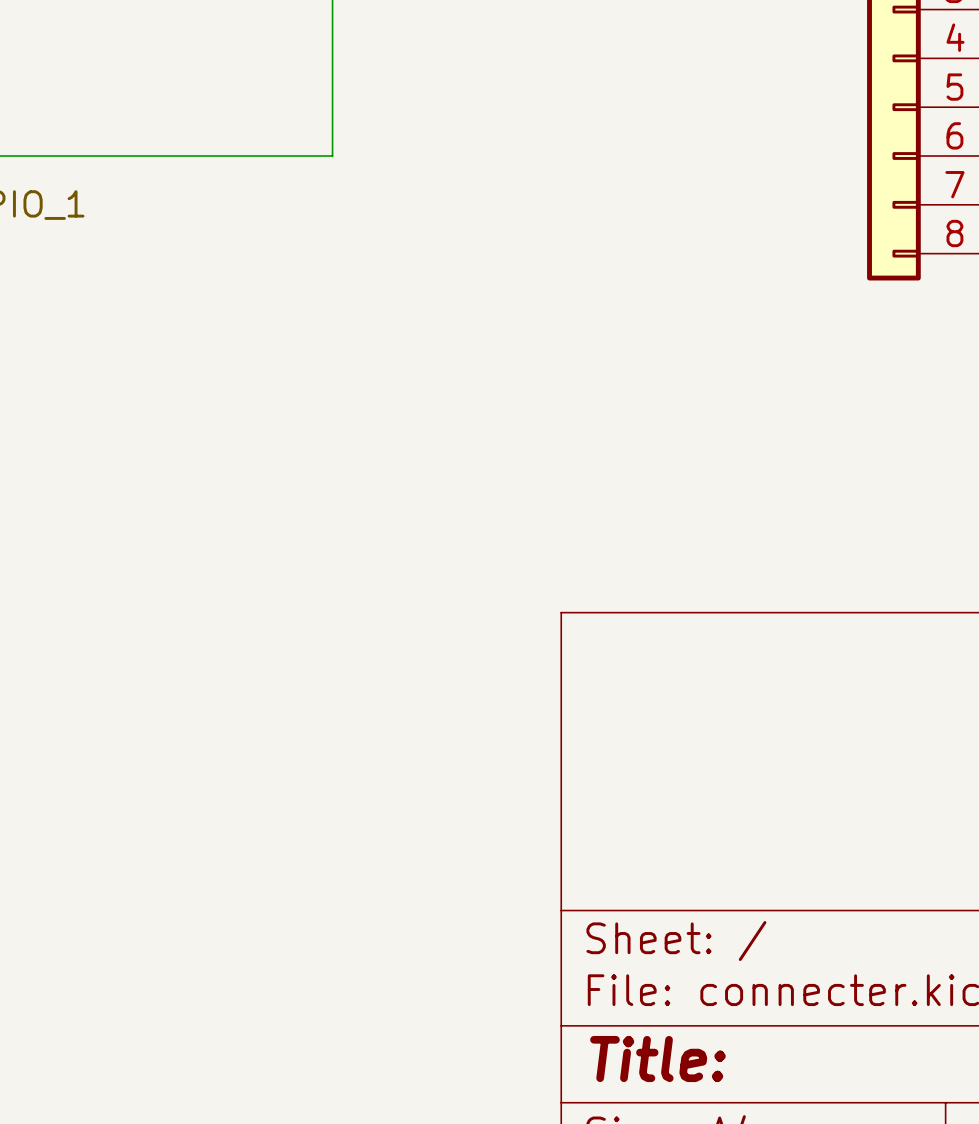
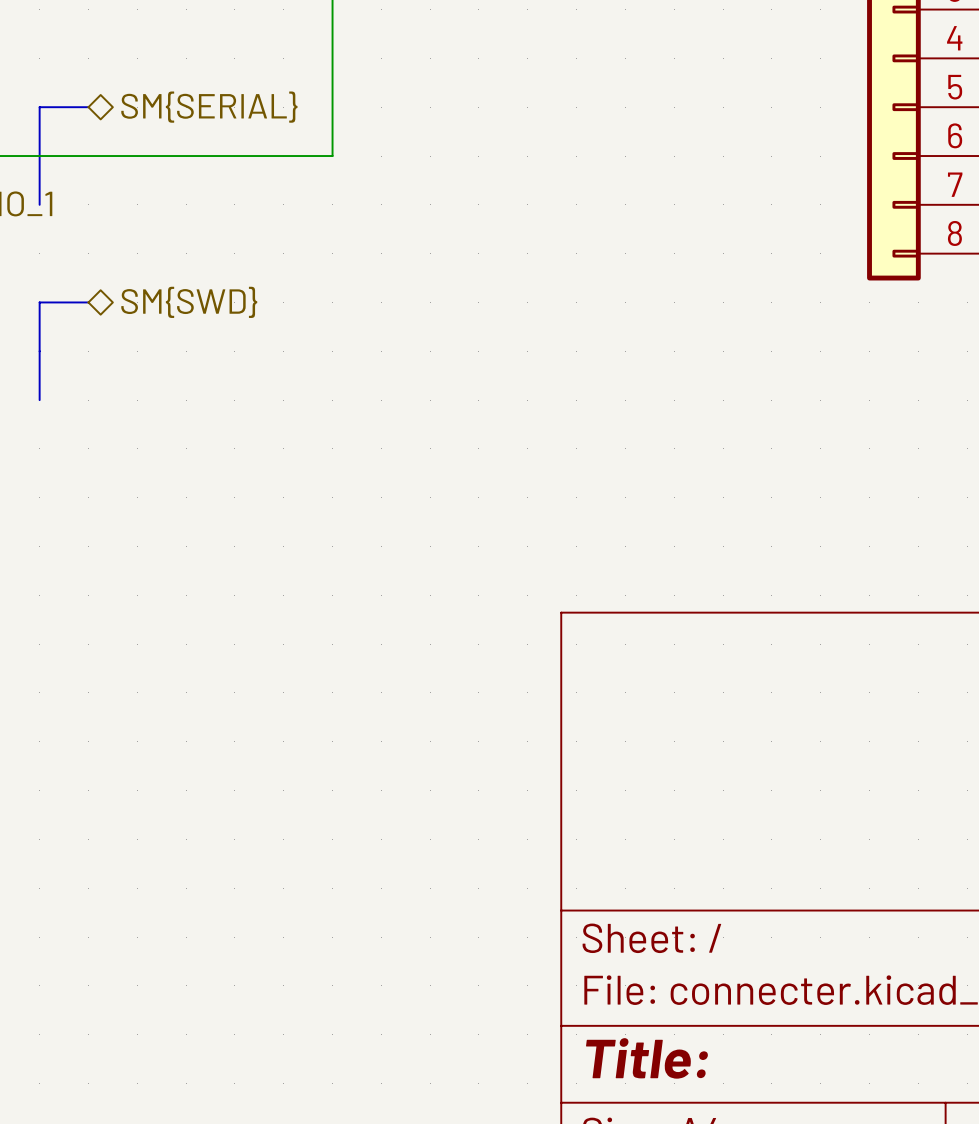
bus: none -> (88, 107) (39, 107) (39, 204)
hierarchical label: none -> SM{SERIAL} (209, 107)
bus: none -> (88, 302) (39, 302) (39, 400)
hierarchical label: none -> SM{SWD} (189, 302)

